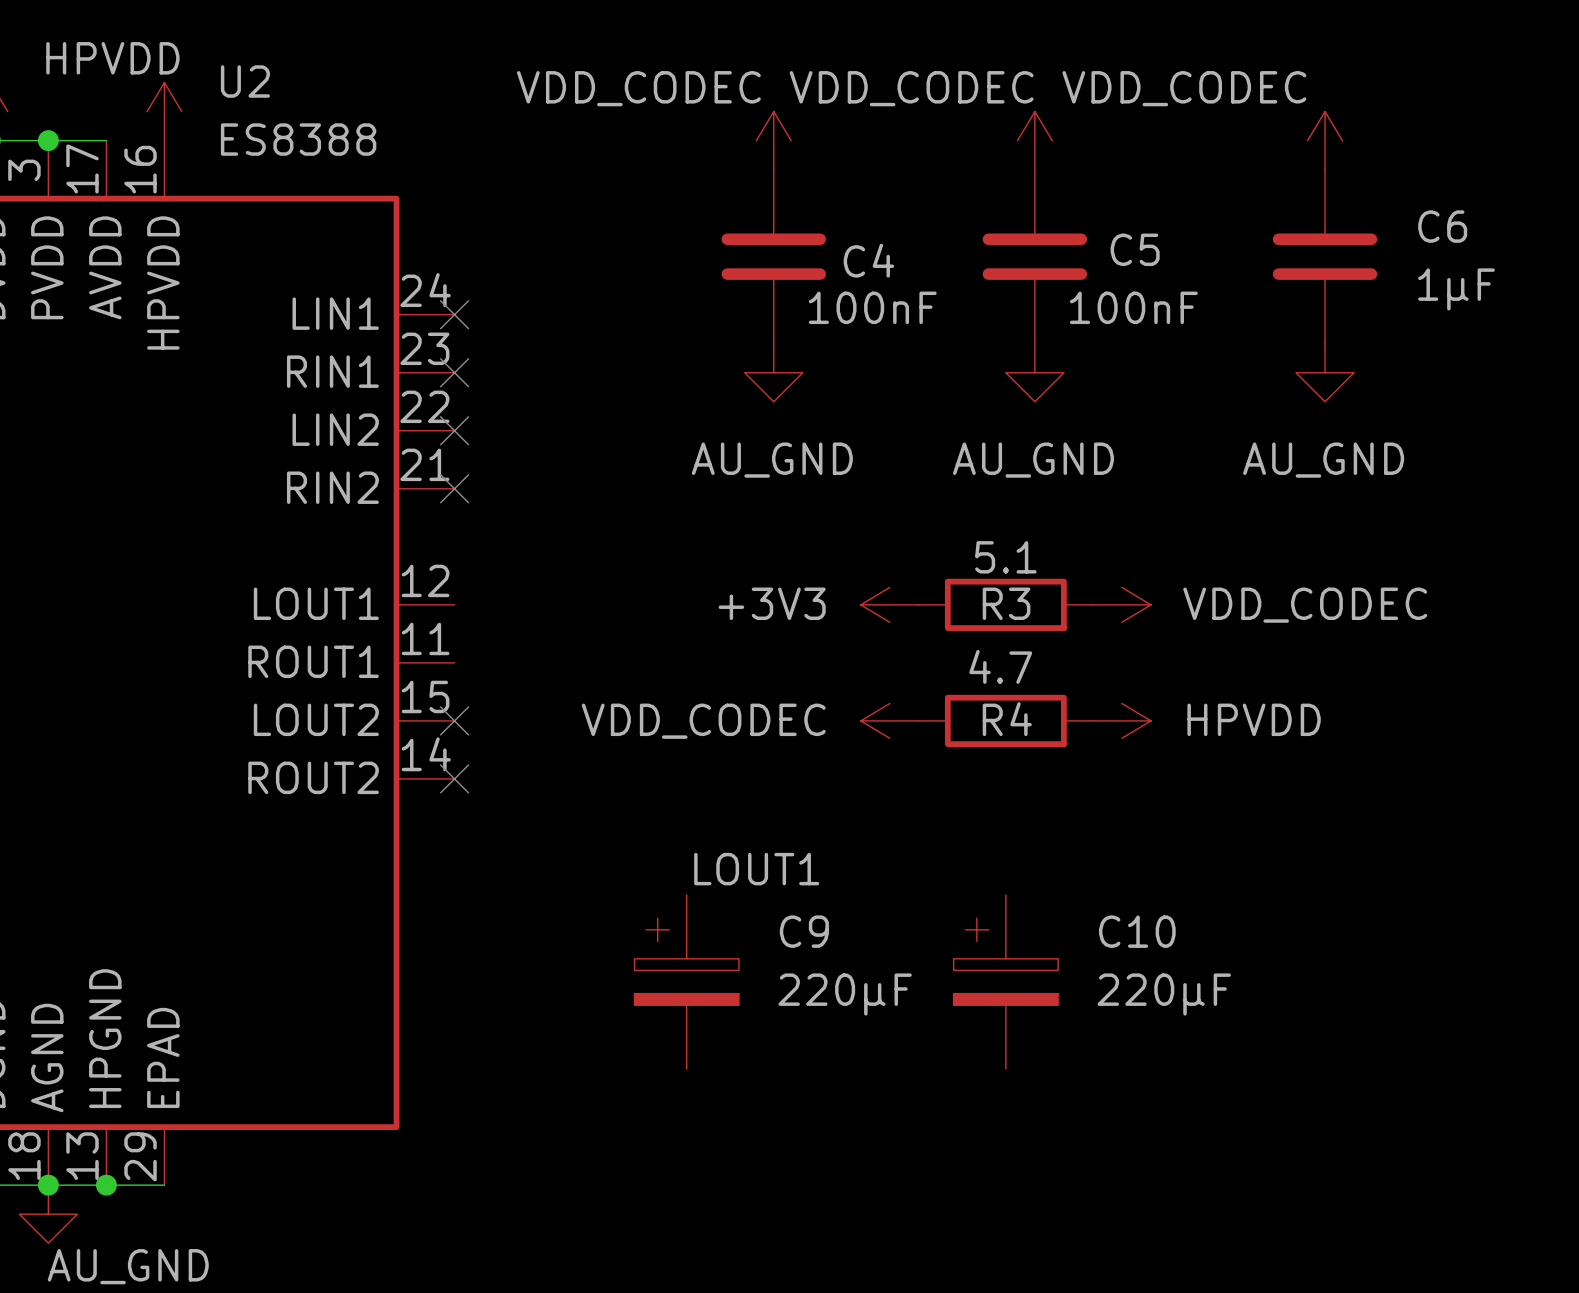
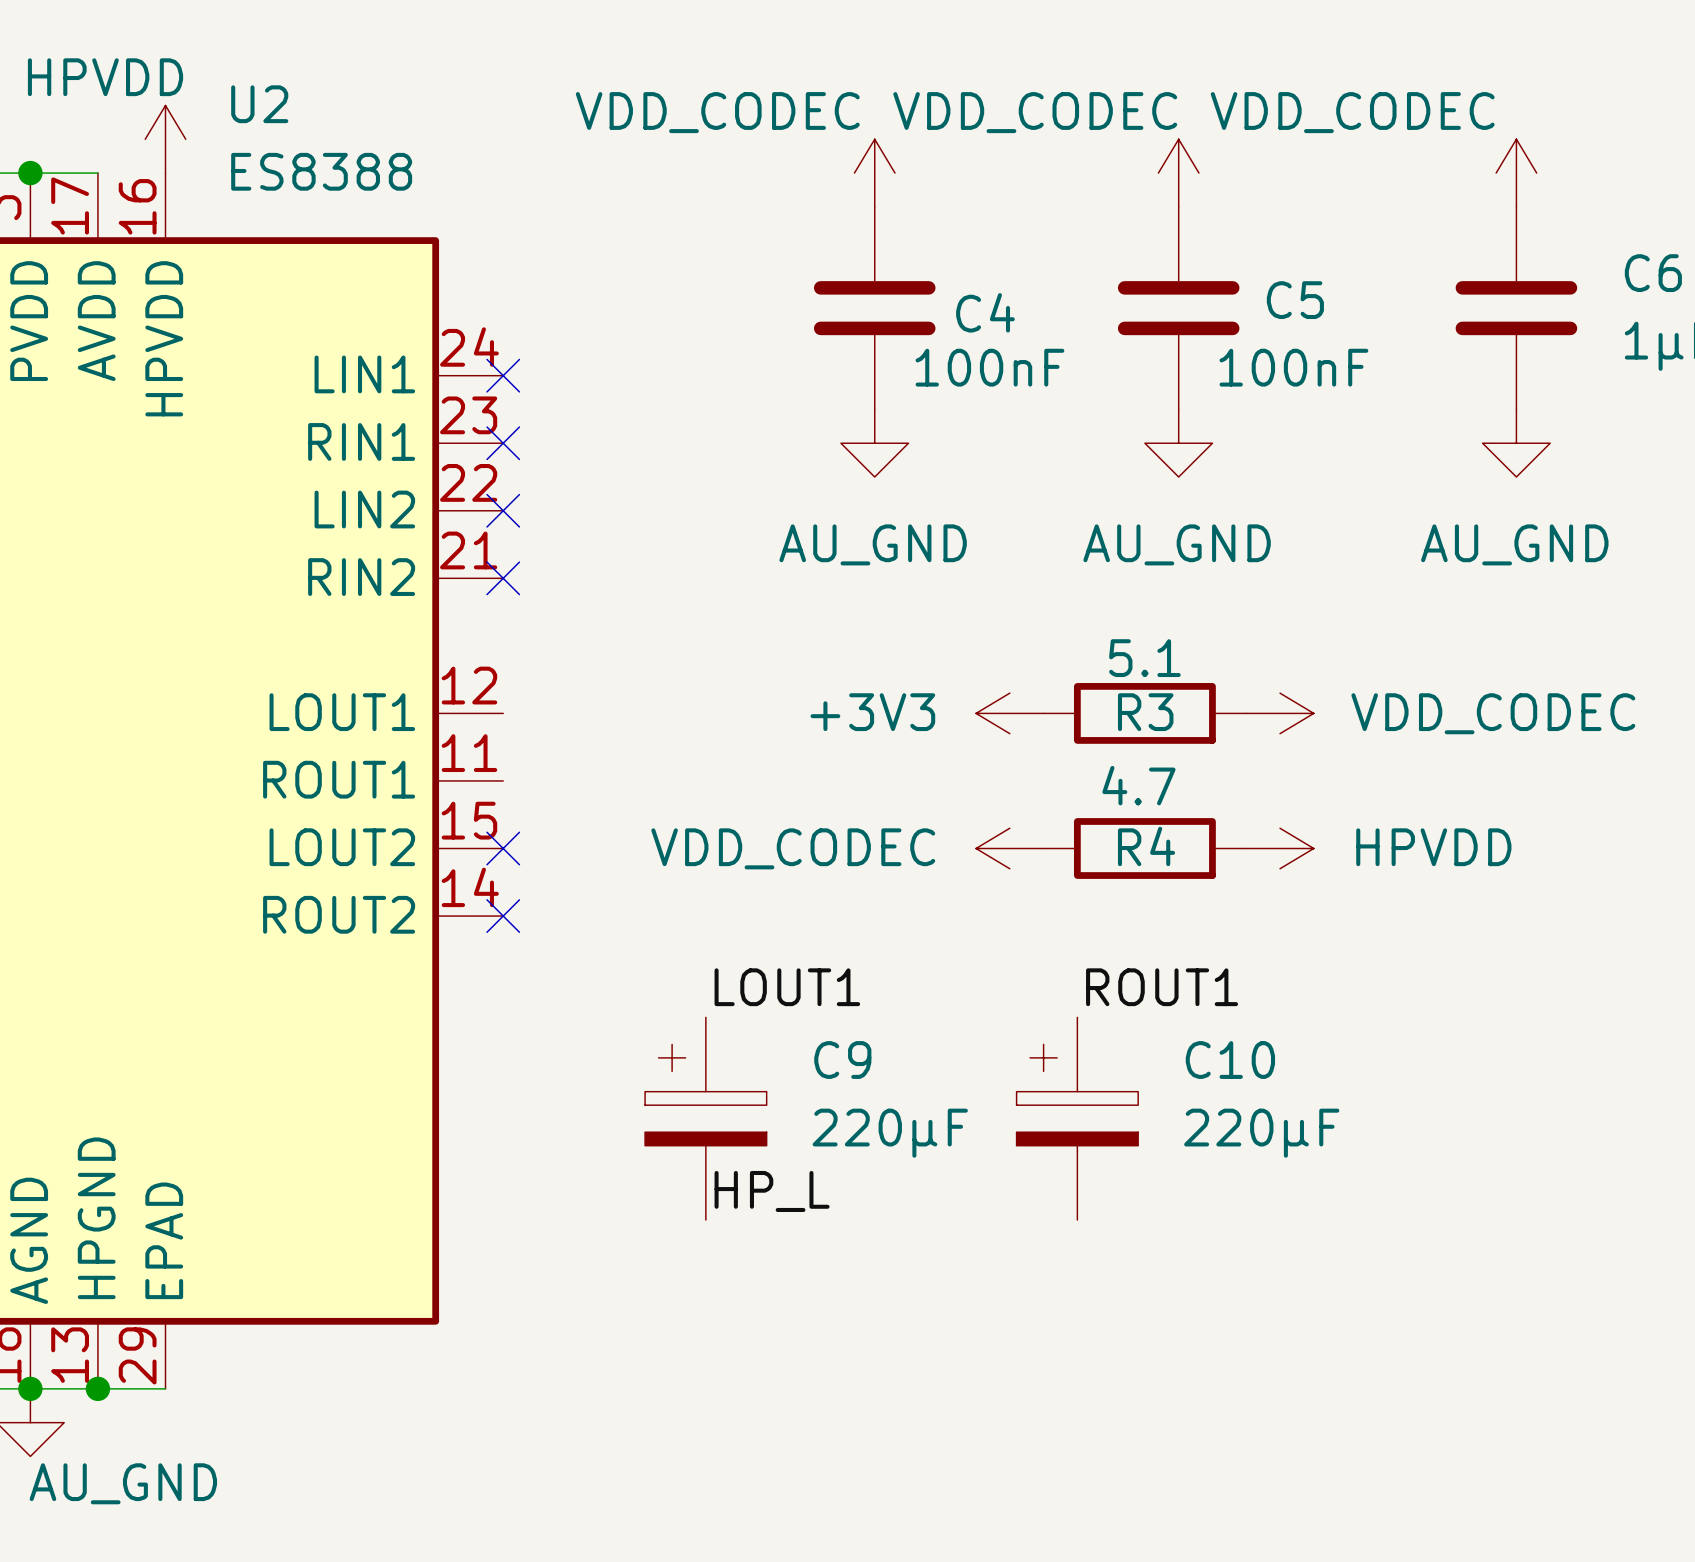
label: none -> ROUT1 (1162, 987)
label position: LOUT1 (756, 869) -> LOUT1 (787, 987)
C9 position: (686, 982) -> (705, 1118)
C10 position: (1005, 982) -> (1077, 1118)
label: none -> HP_L (772, 1191)

